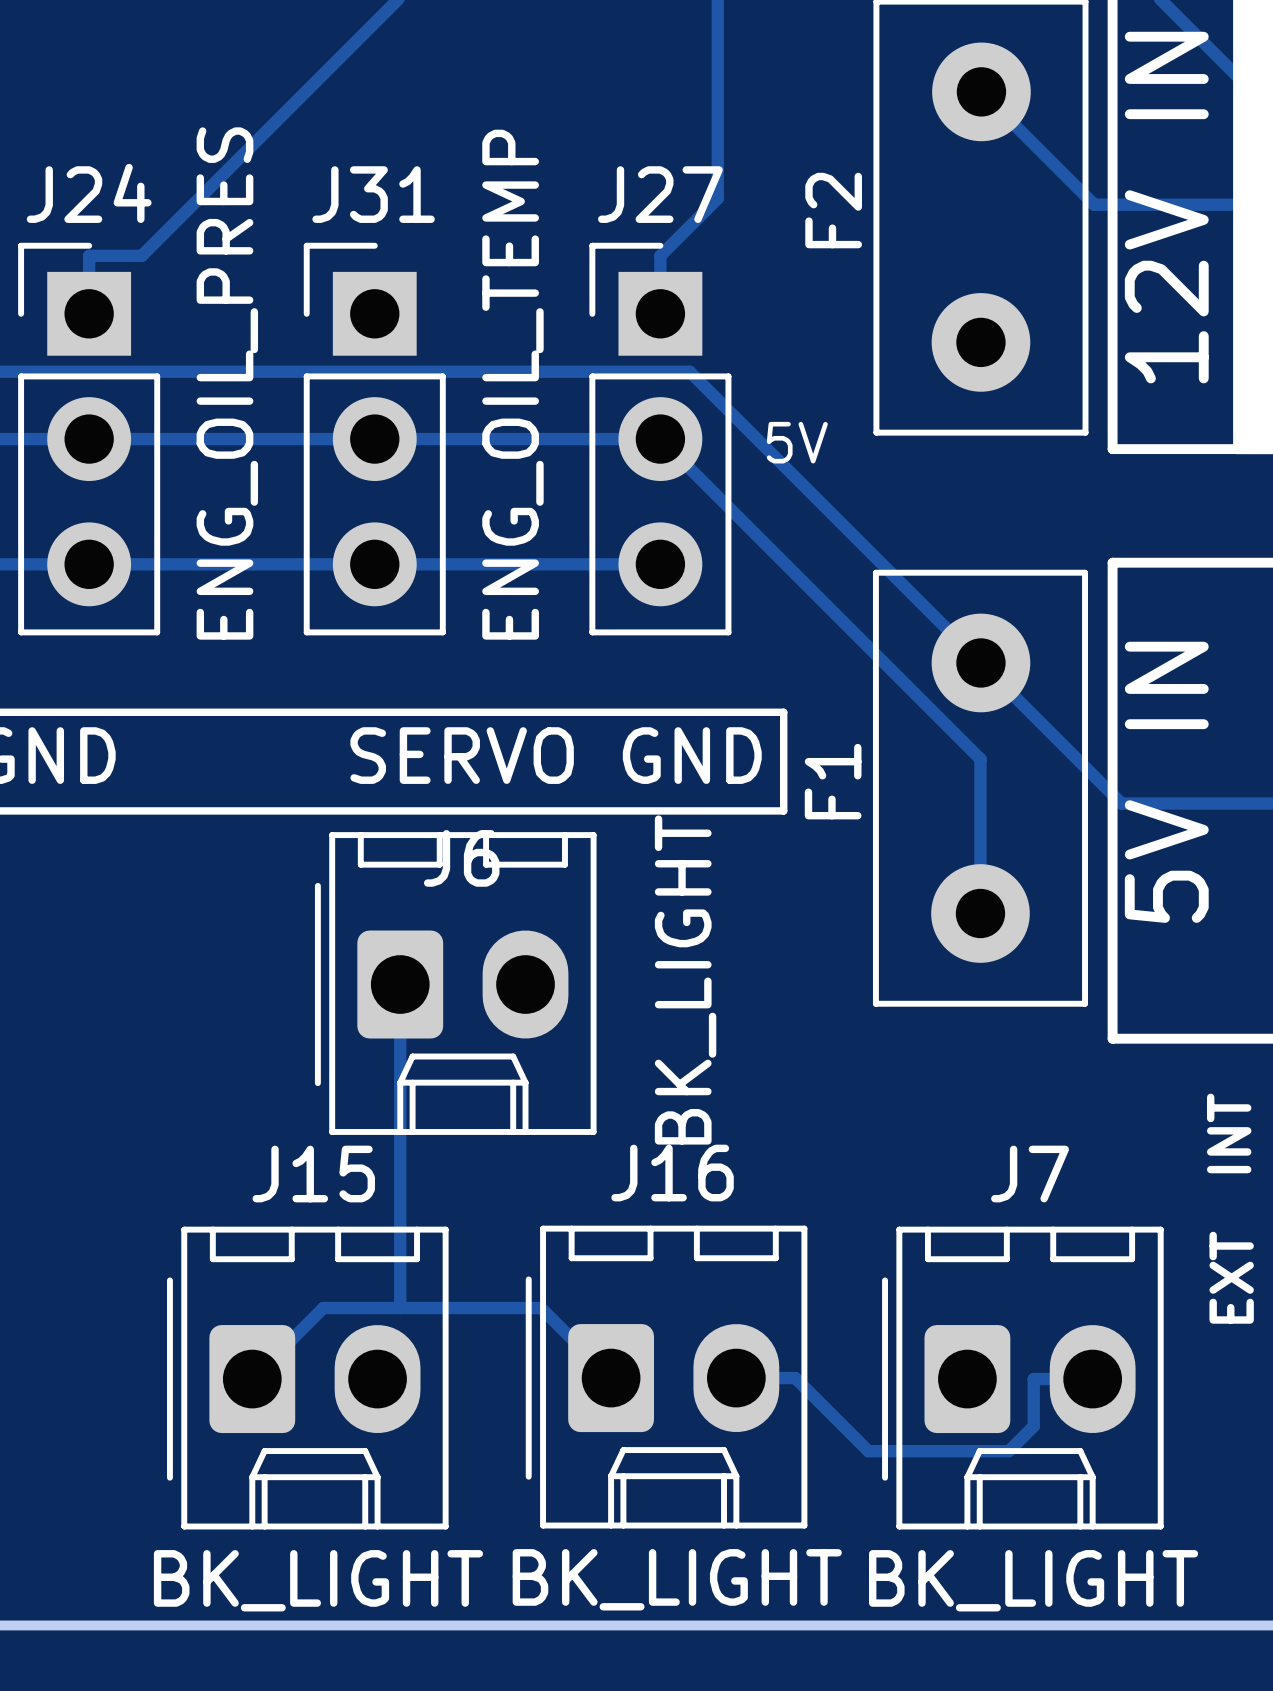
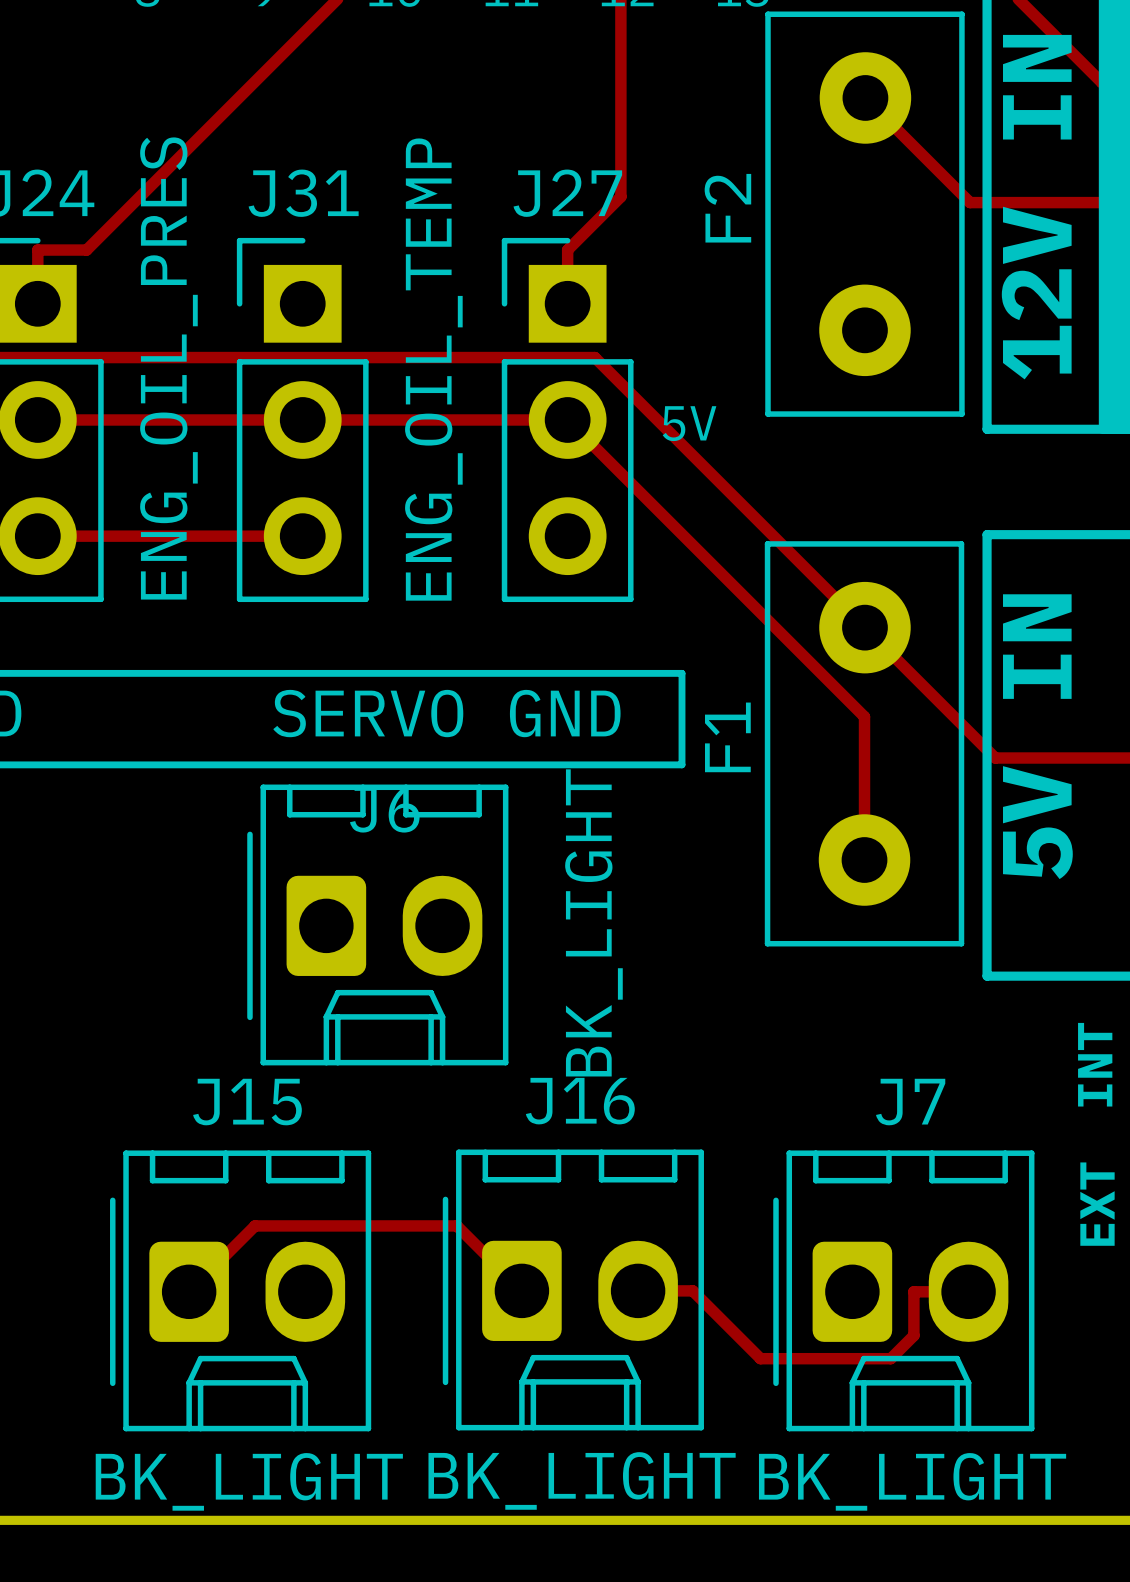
track: (374, 564) (660, 564) -> none
track: (400, 984) (400, 1308) -> none

